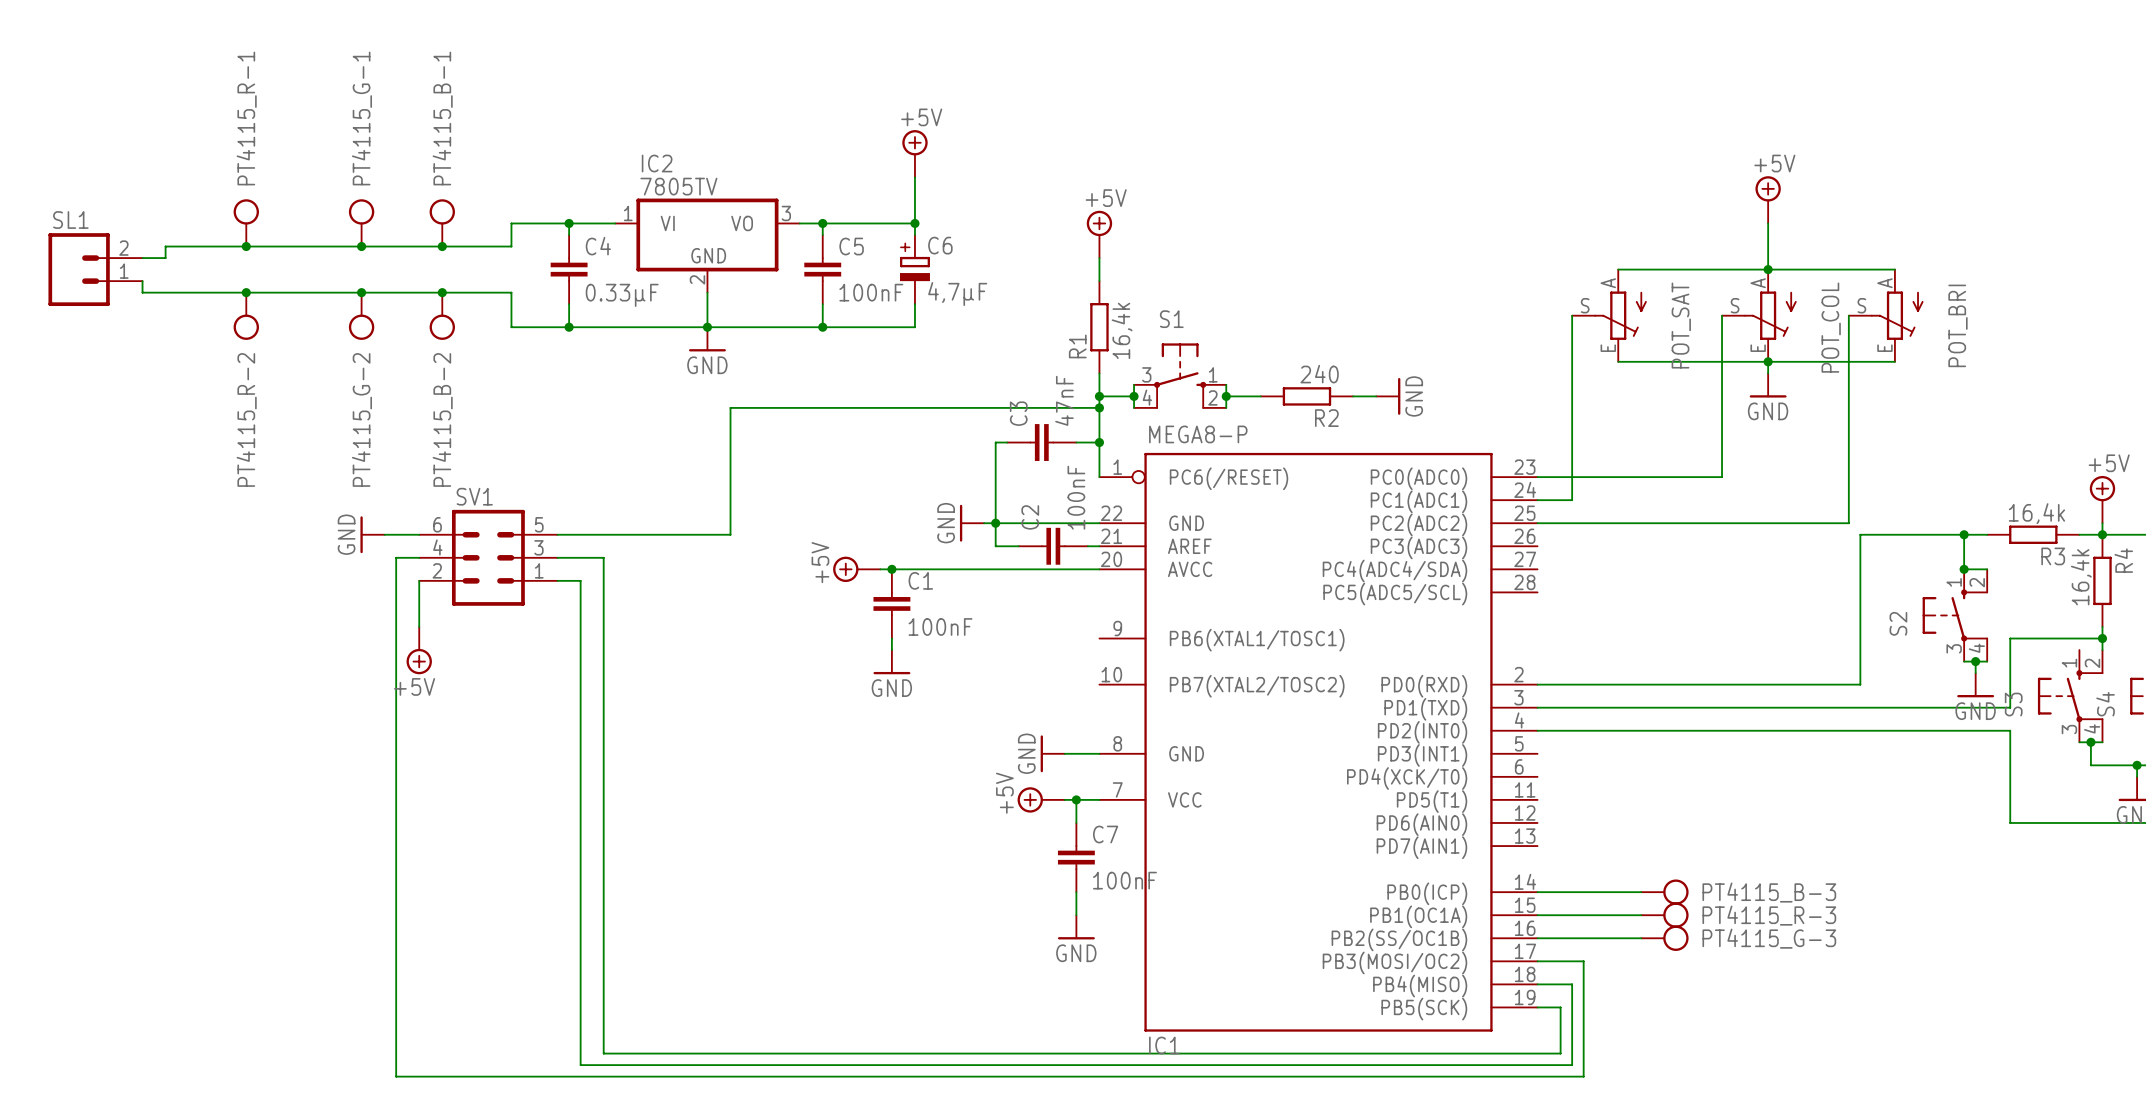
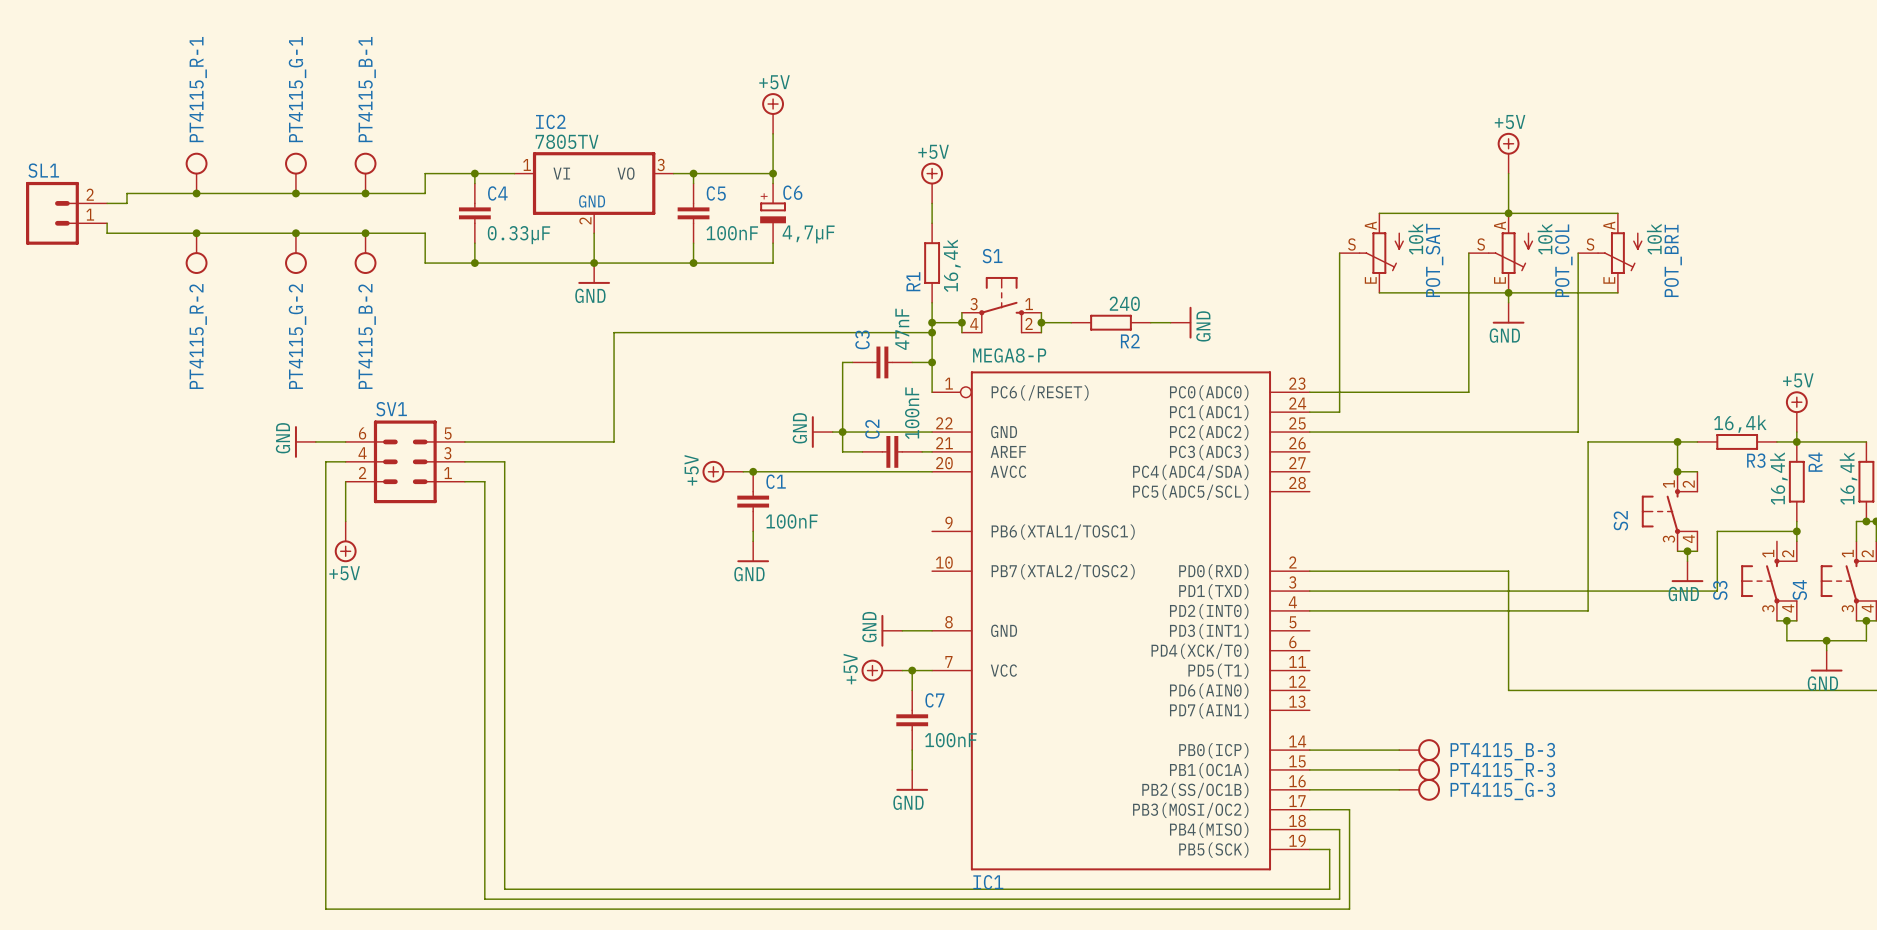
POT_SAT value: none -> 10k (1415, 239)
POT_COL value: none -> 10k (1545, 239)
POT_BRI value: none -> 10k (1654, 239)
wire: (1768, 684) (1860, 684) -> (1588, 610) (1588, 571)
wire: (1860, 730) (2010, 730) (2010, 822) -> (1508, 571) (1508, 690) (1717, 690)

